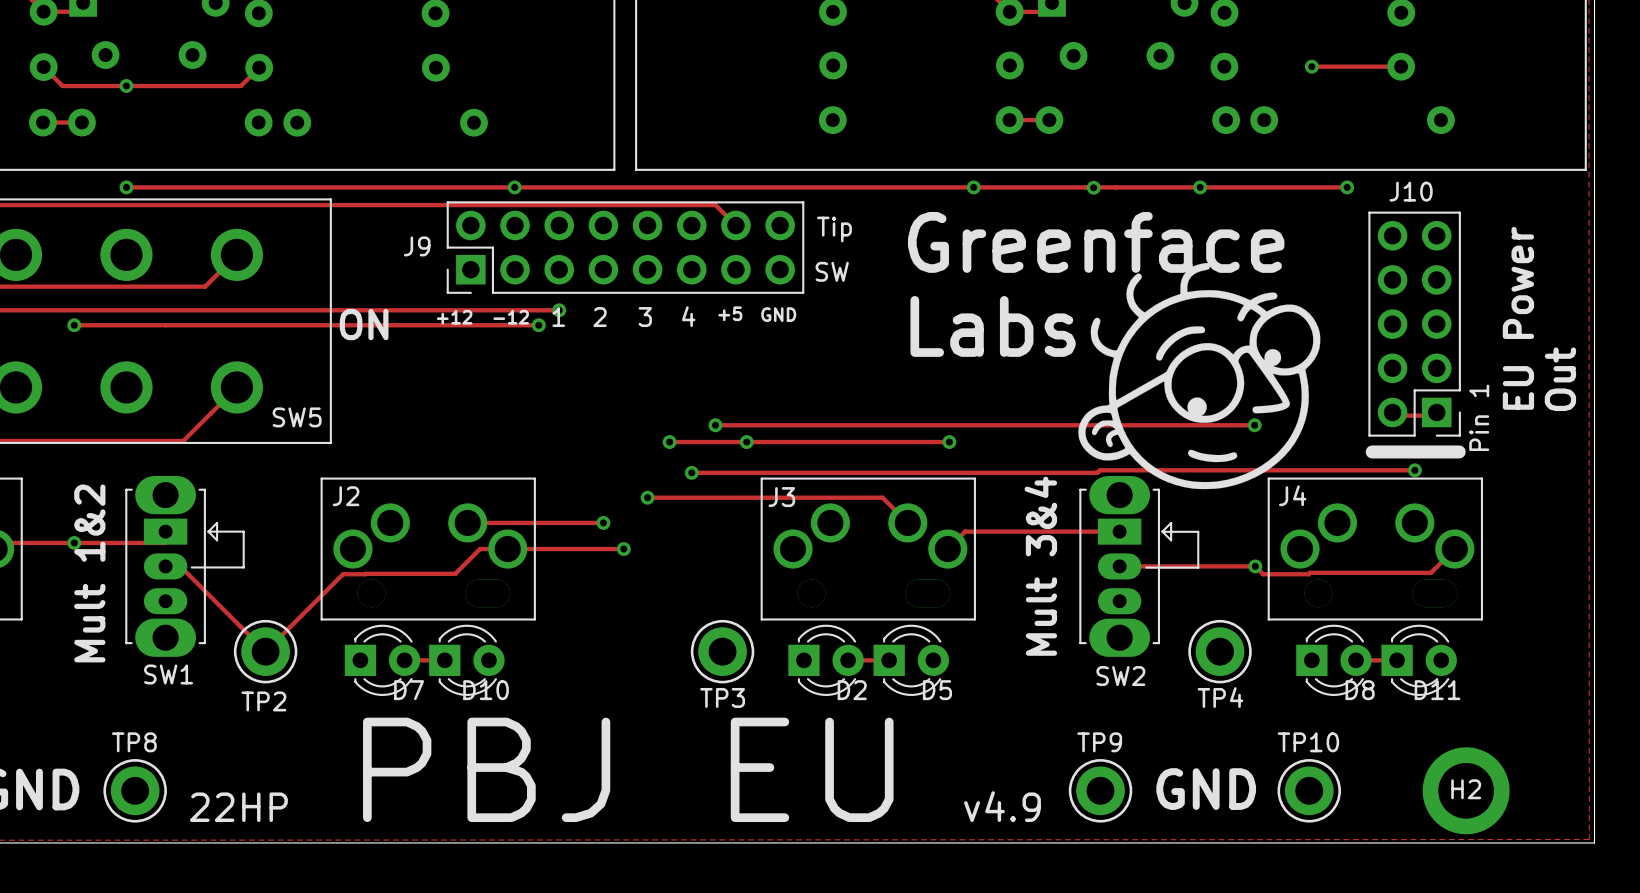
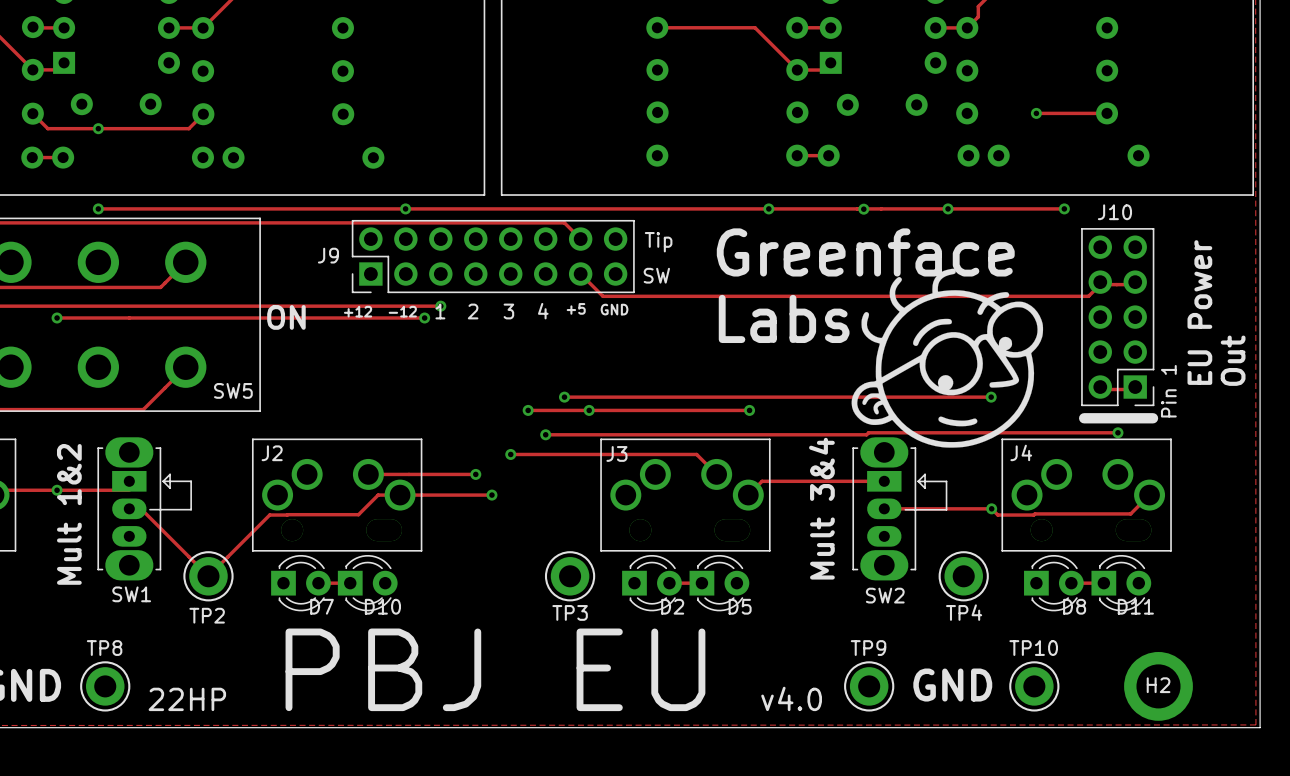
track: none -> (580, 274) (602, 296) (1088, 296) (1100, 284) (1135, 284)
text: v4.9 (1002, 806) -> v4.0 (791, 698)

